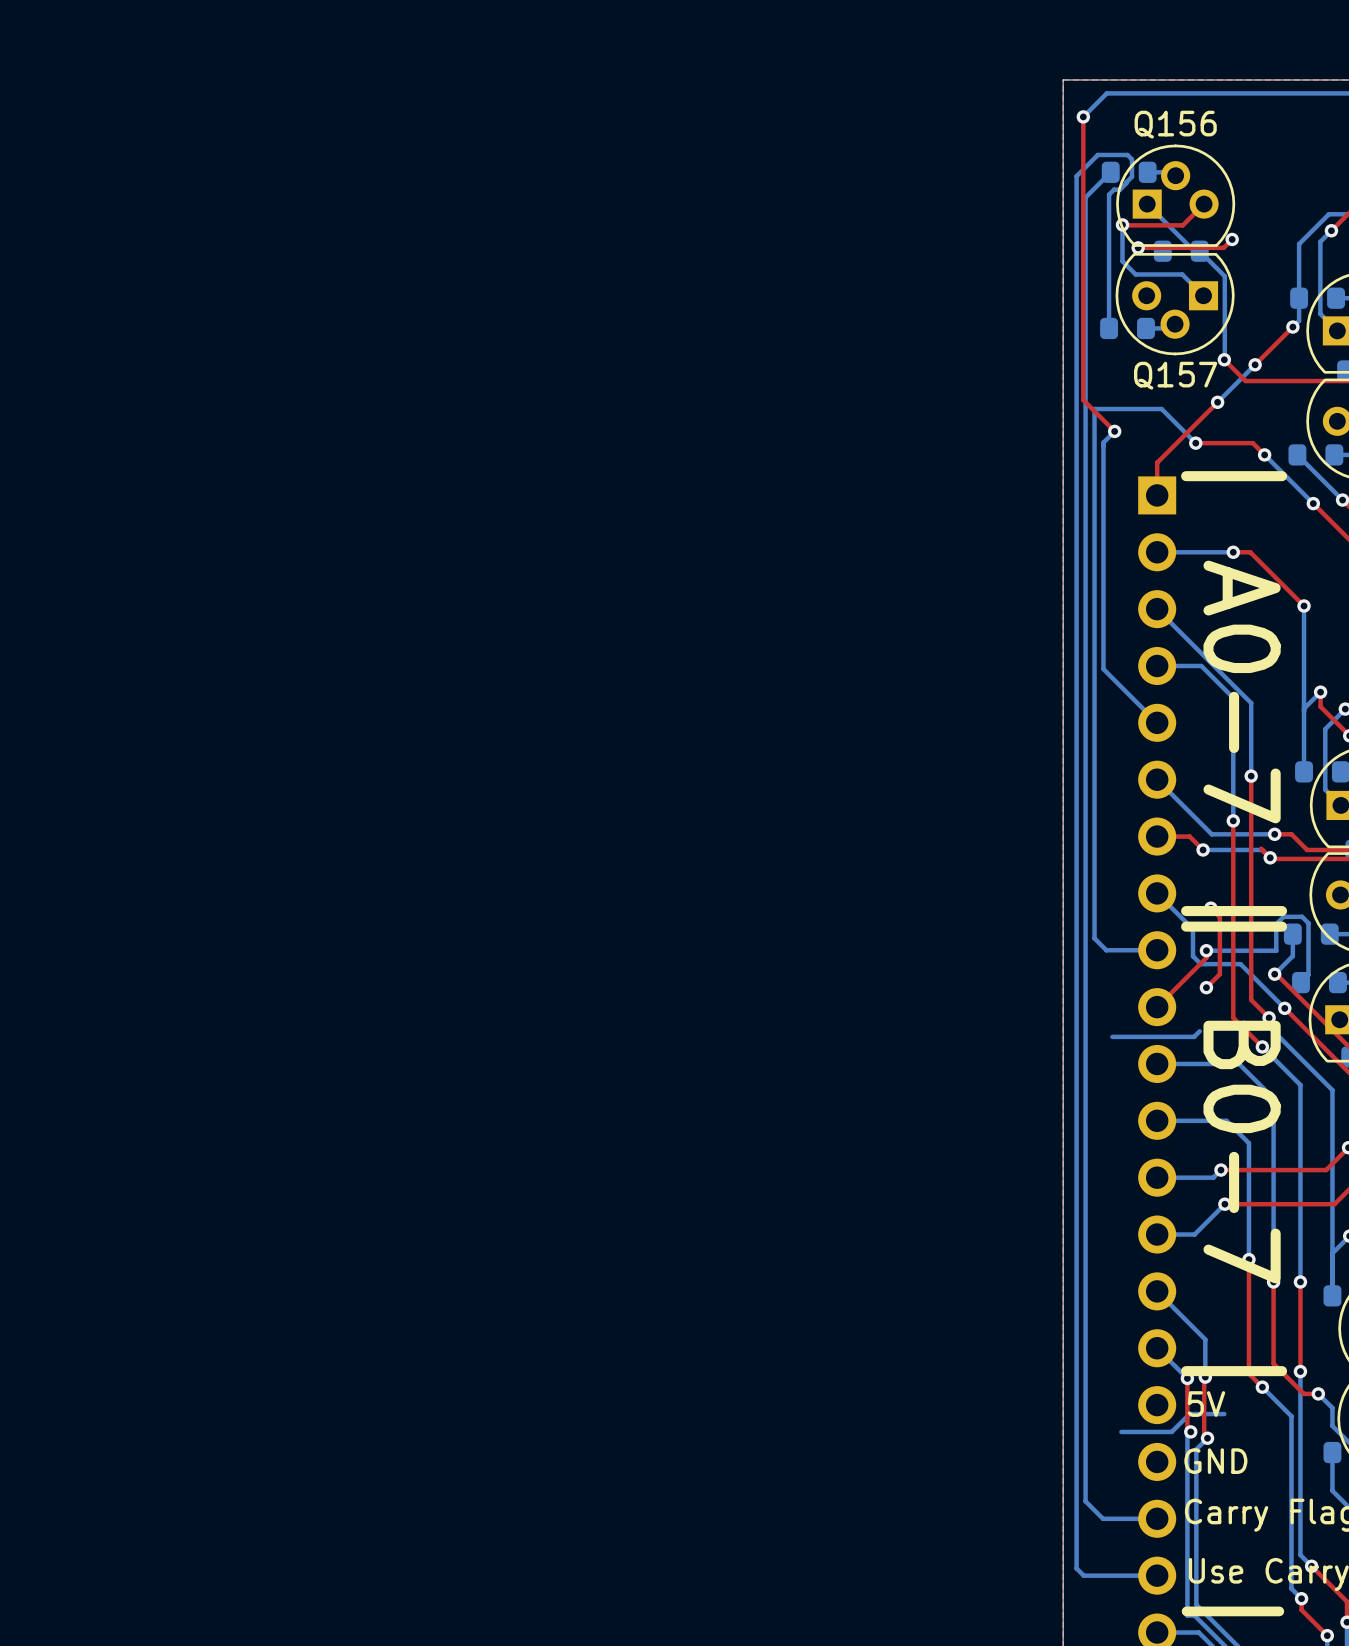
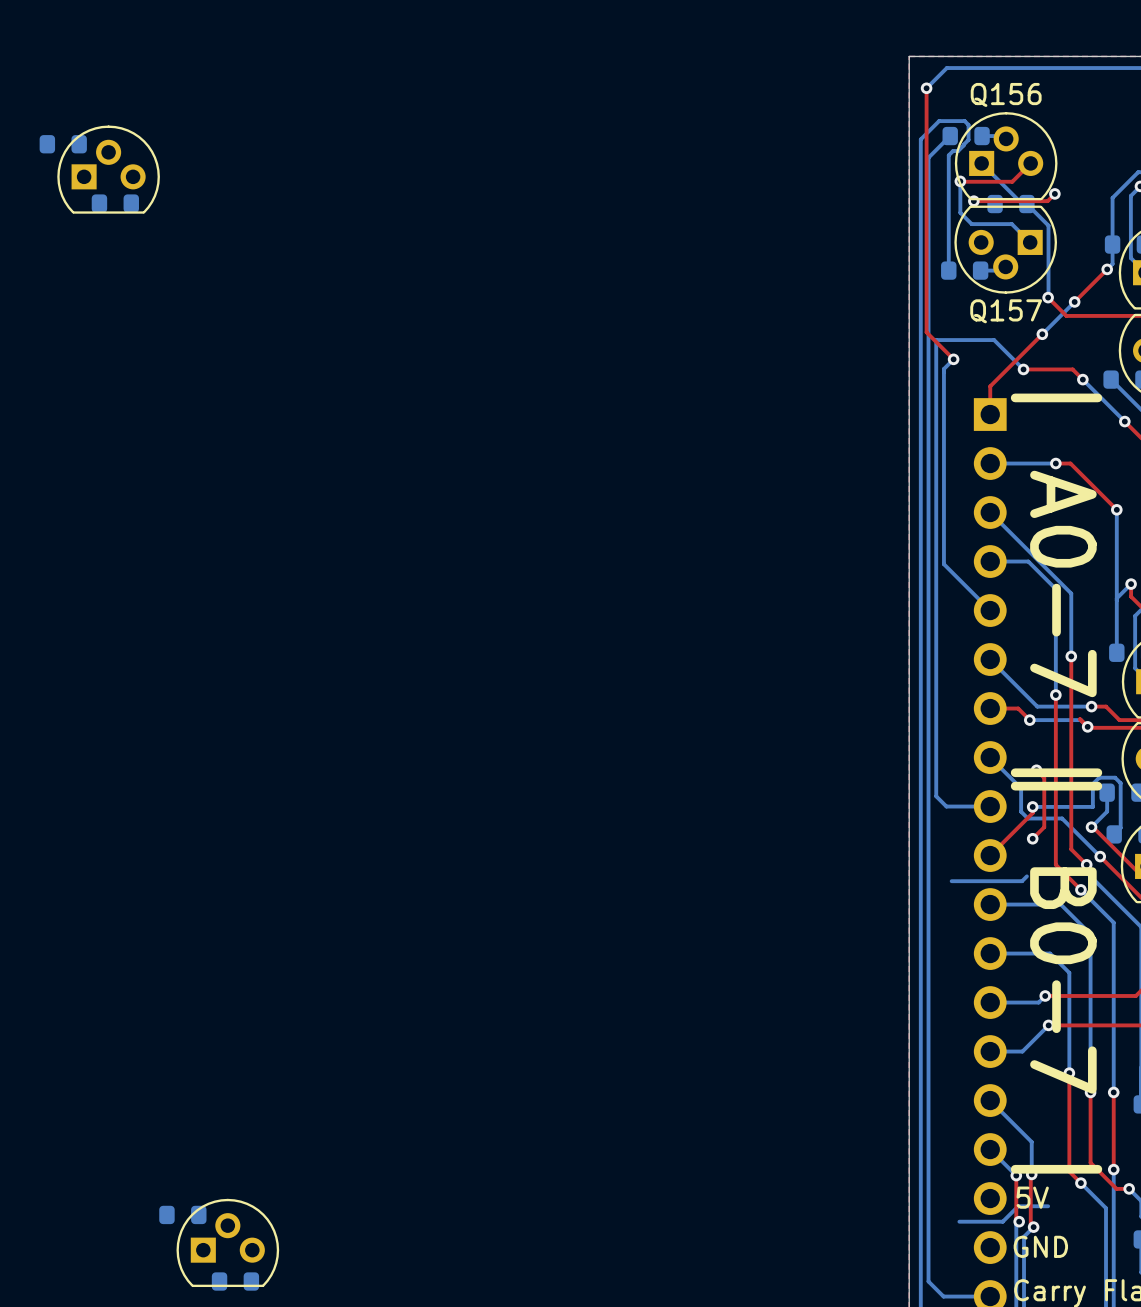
part: none -> (63, 144)
part: none -> (108, 169)
part: none -> (115, 203)
part: none -> (182, 1214)
part: none -> (227, 1242)
part: none -> (235, 1281)

